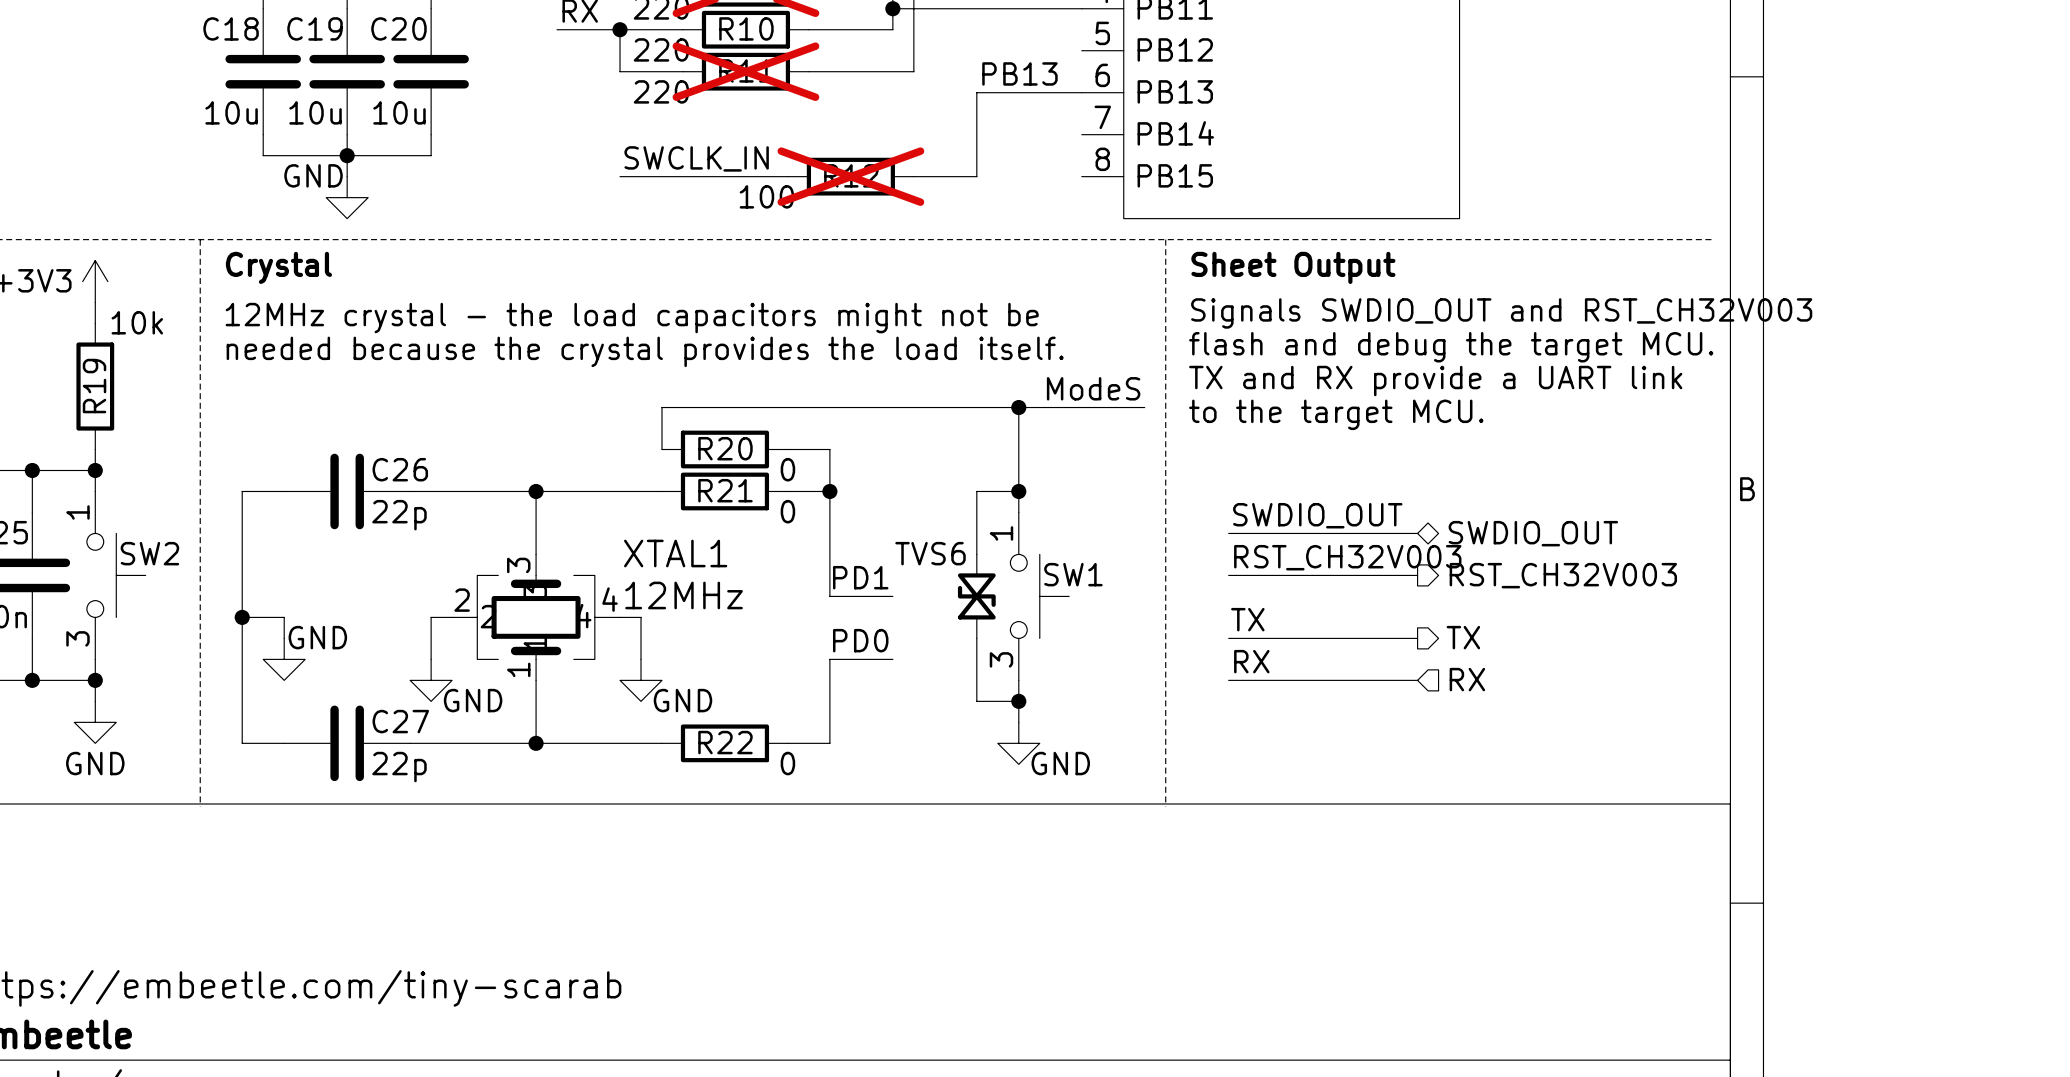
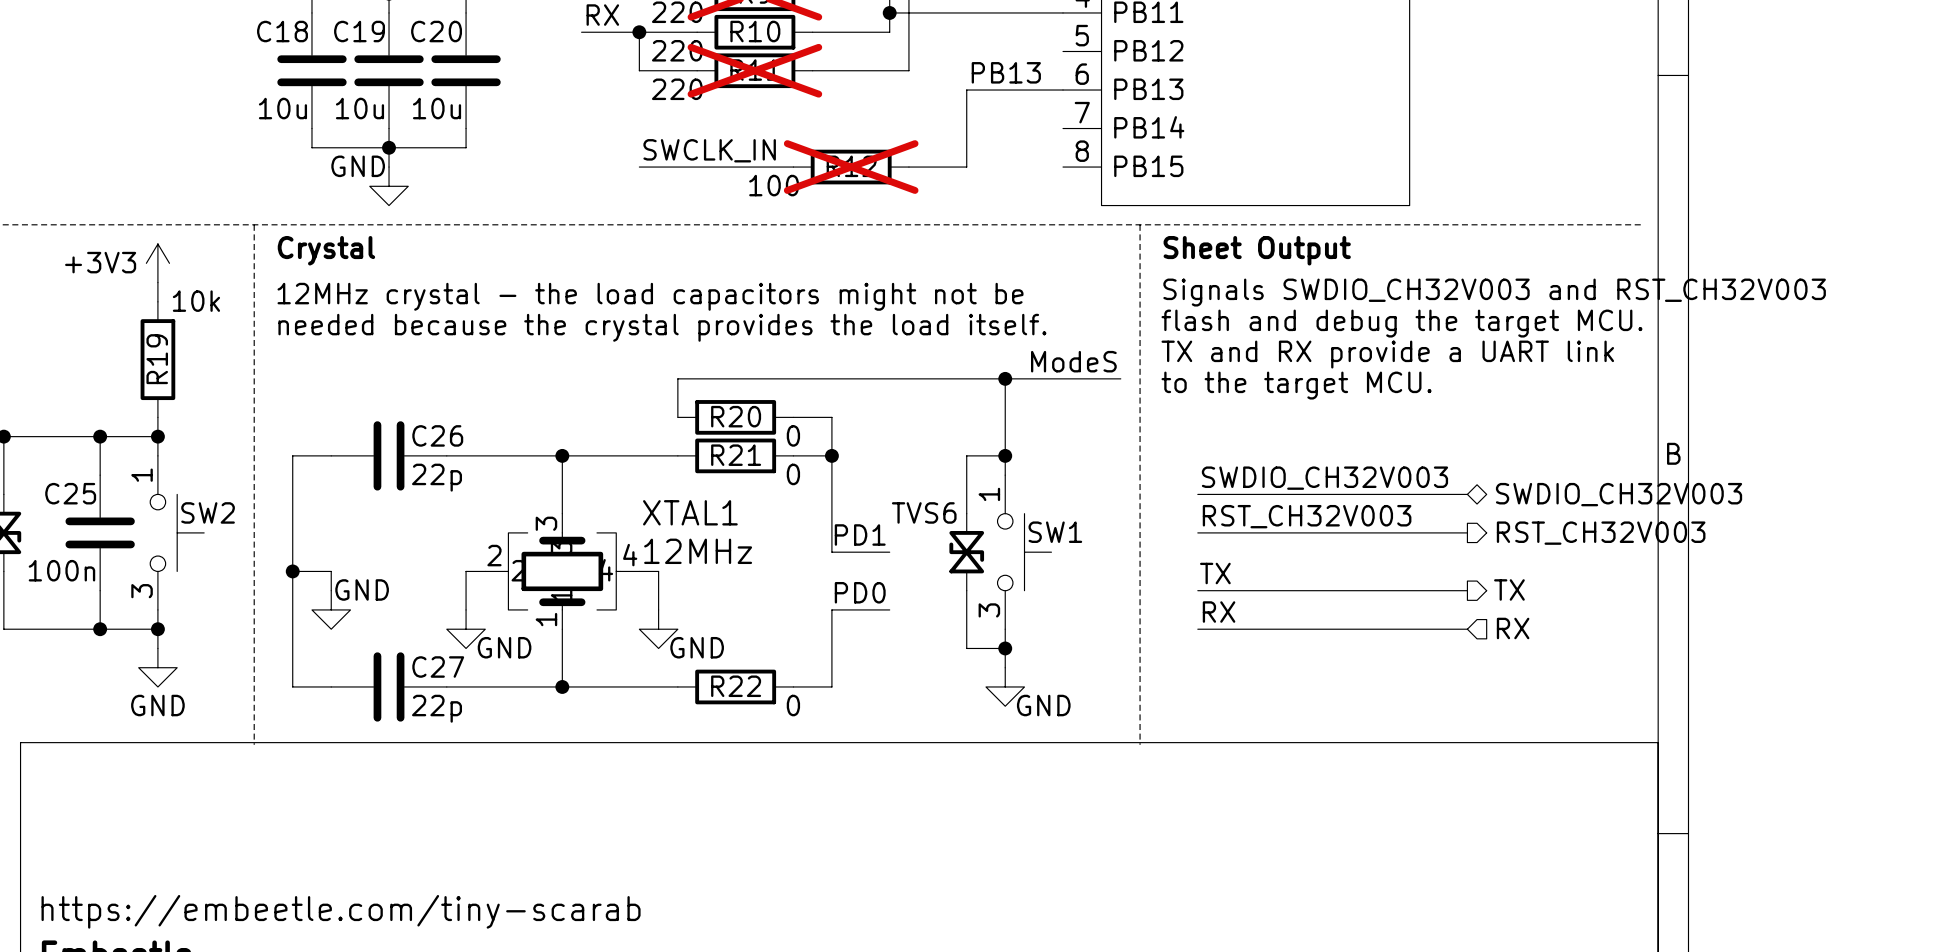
text: Signals SWDIO_OUT and RST_CH32V003 (1501, 313) -> Signals SWDIO_CH32V003 and RST_CH32V003 (1494, 292)
label: SWDIO_OUT (1317, 515) -> SWDIO_CH32V003 (1324, 478)
wire: none -> (1371, 494) (1467, 494)
hierarchical label: SWDIO_OUT (1533, 533) -> none
hierarchical label: none -> SWDIO_CH32V003 (1619, 494)
wire: none -> (1371, 532) (1467, 532)
hierarchical label position: RST_CH32V003 (1563, 575) -> RST_CH32V003 (1601, 533)
hierarchical label position: TX (1463, 637) -> TX (1509, 589)
wire: none -> (1371, 590) (1467, 590)
hierarchical label position: RX (1467, 679) -> RX (1513, 628)
wire: none -> (1371, 629) (1467, 629)

